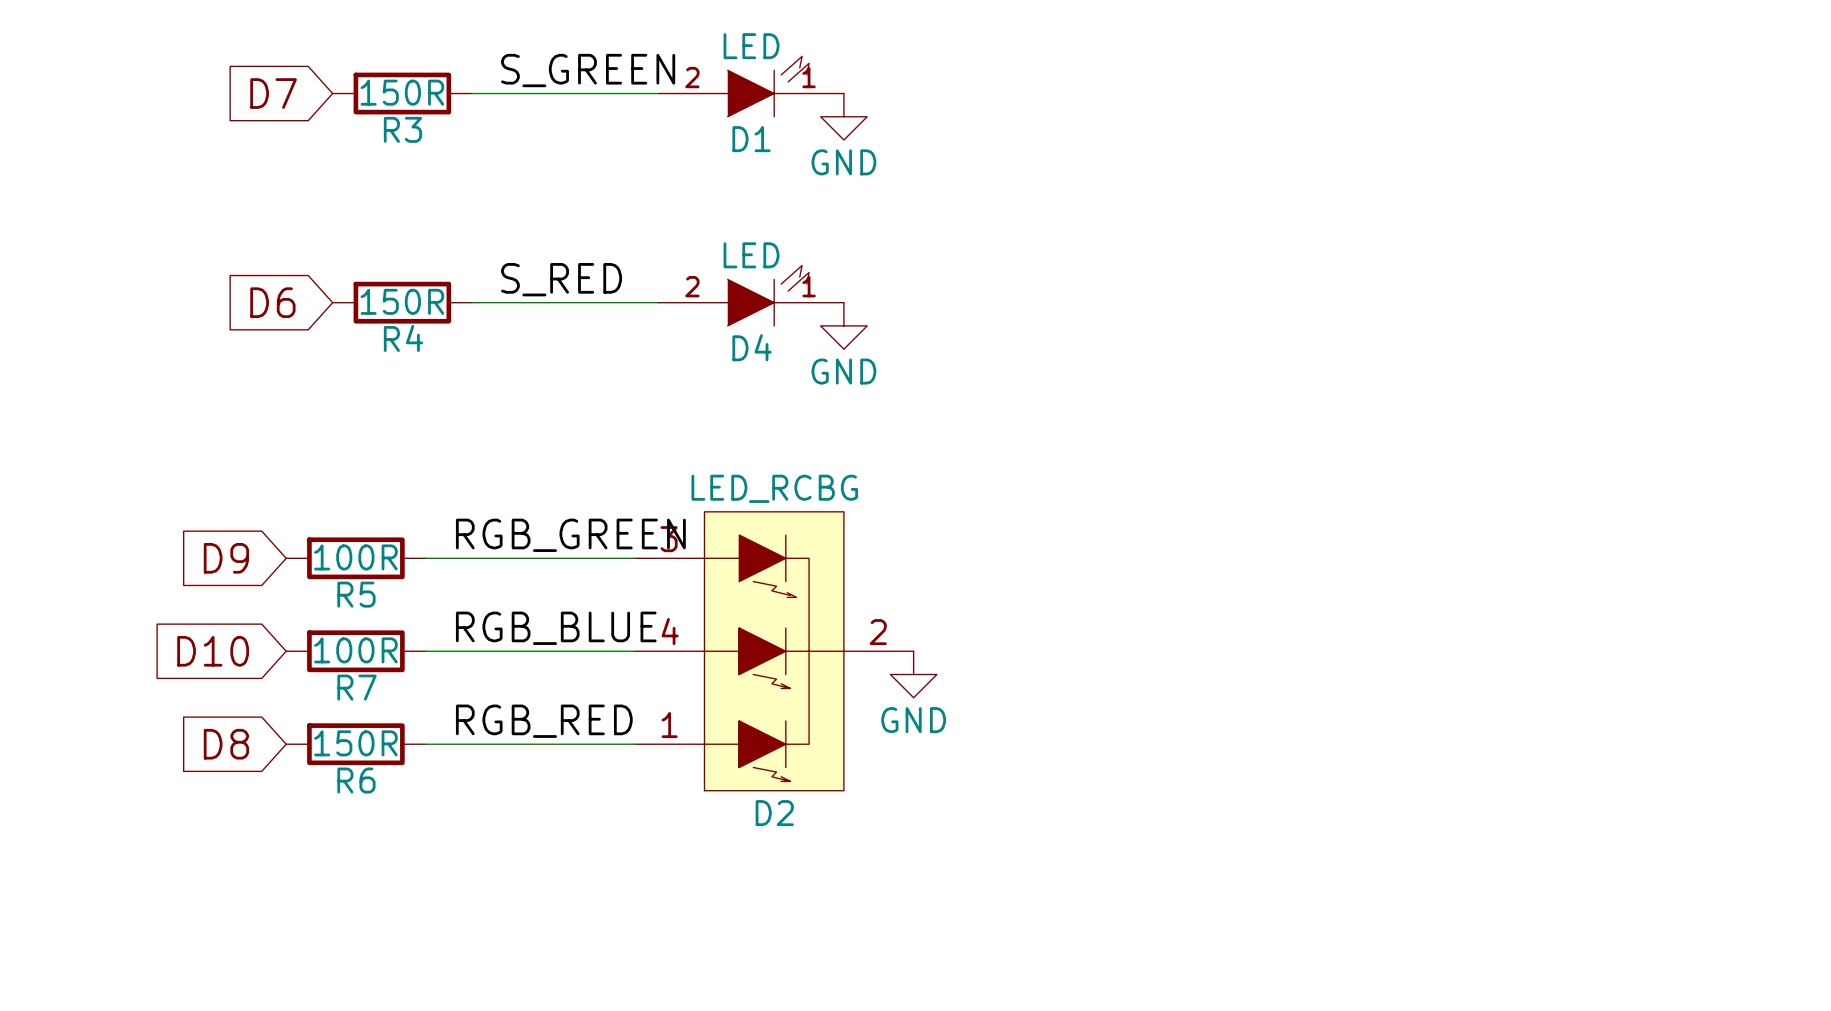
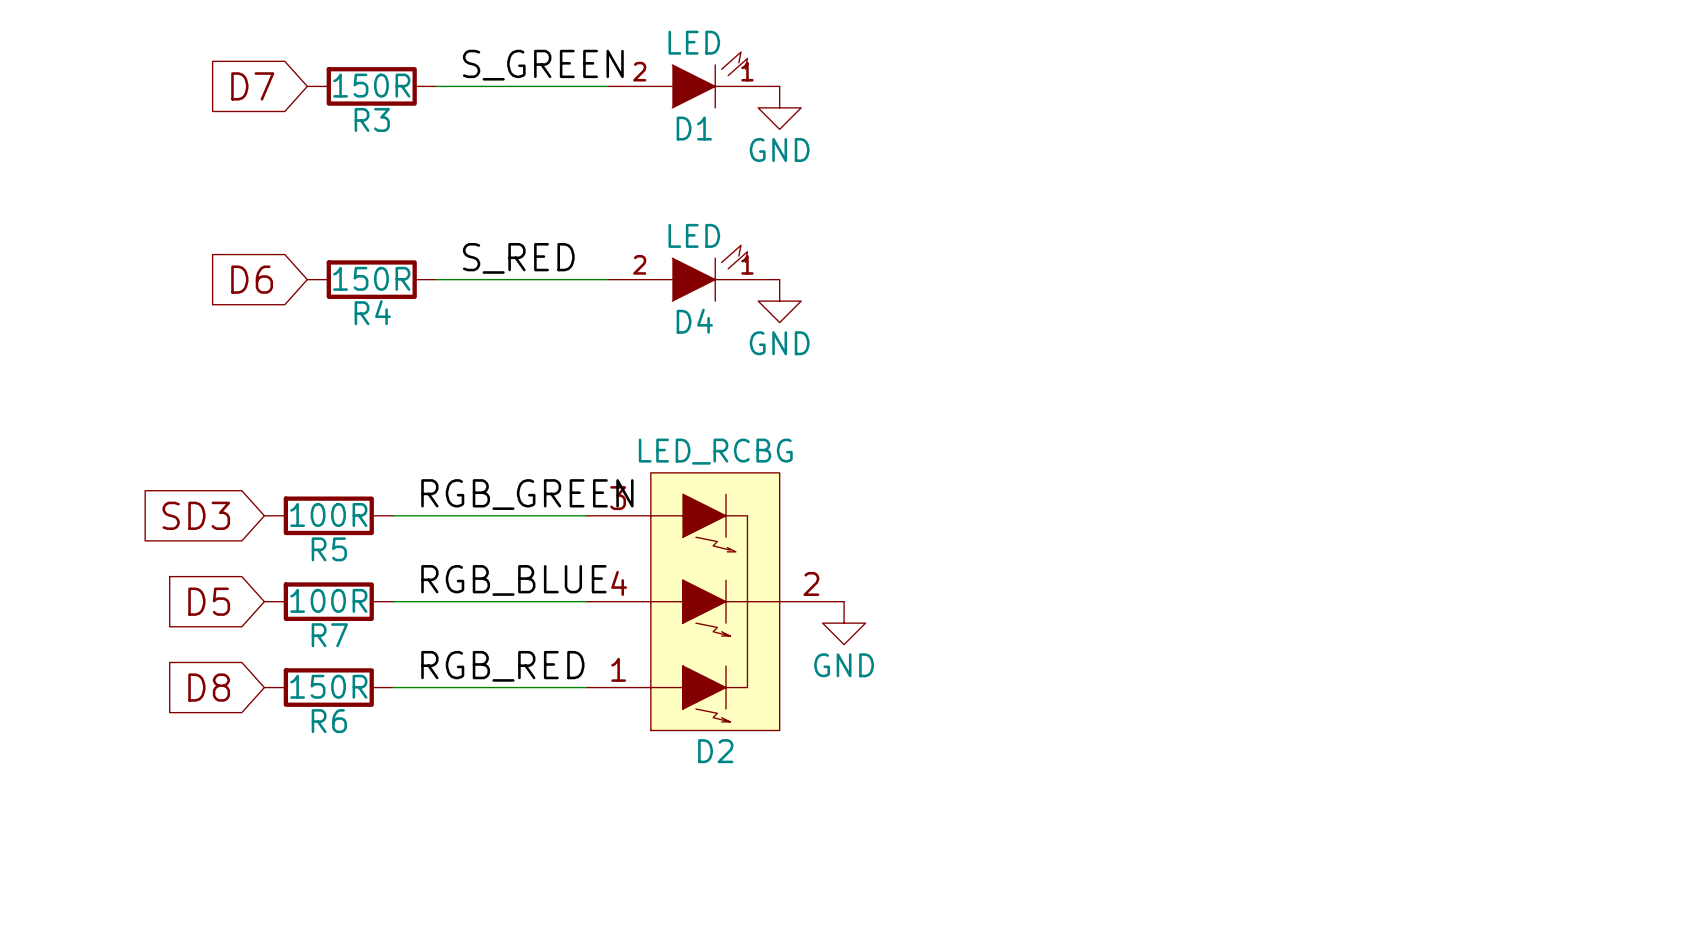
global label: D9 (226, 558) -> SD3 (196, 515)
global label: D10 (213, 651) -> D5 (209, 601)

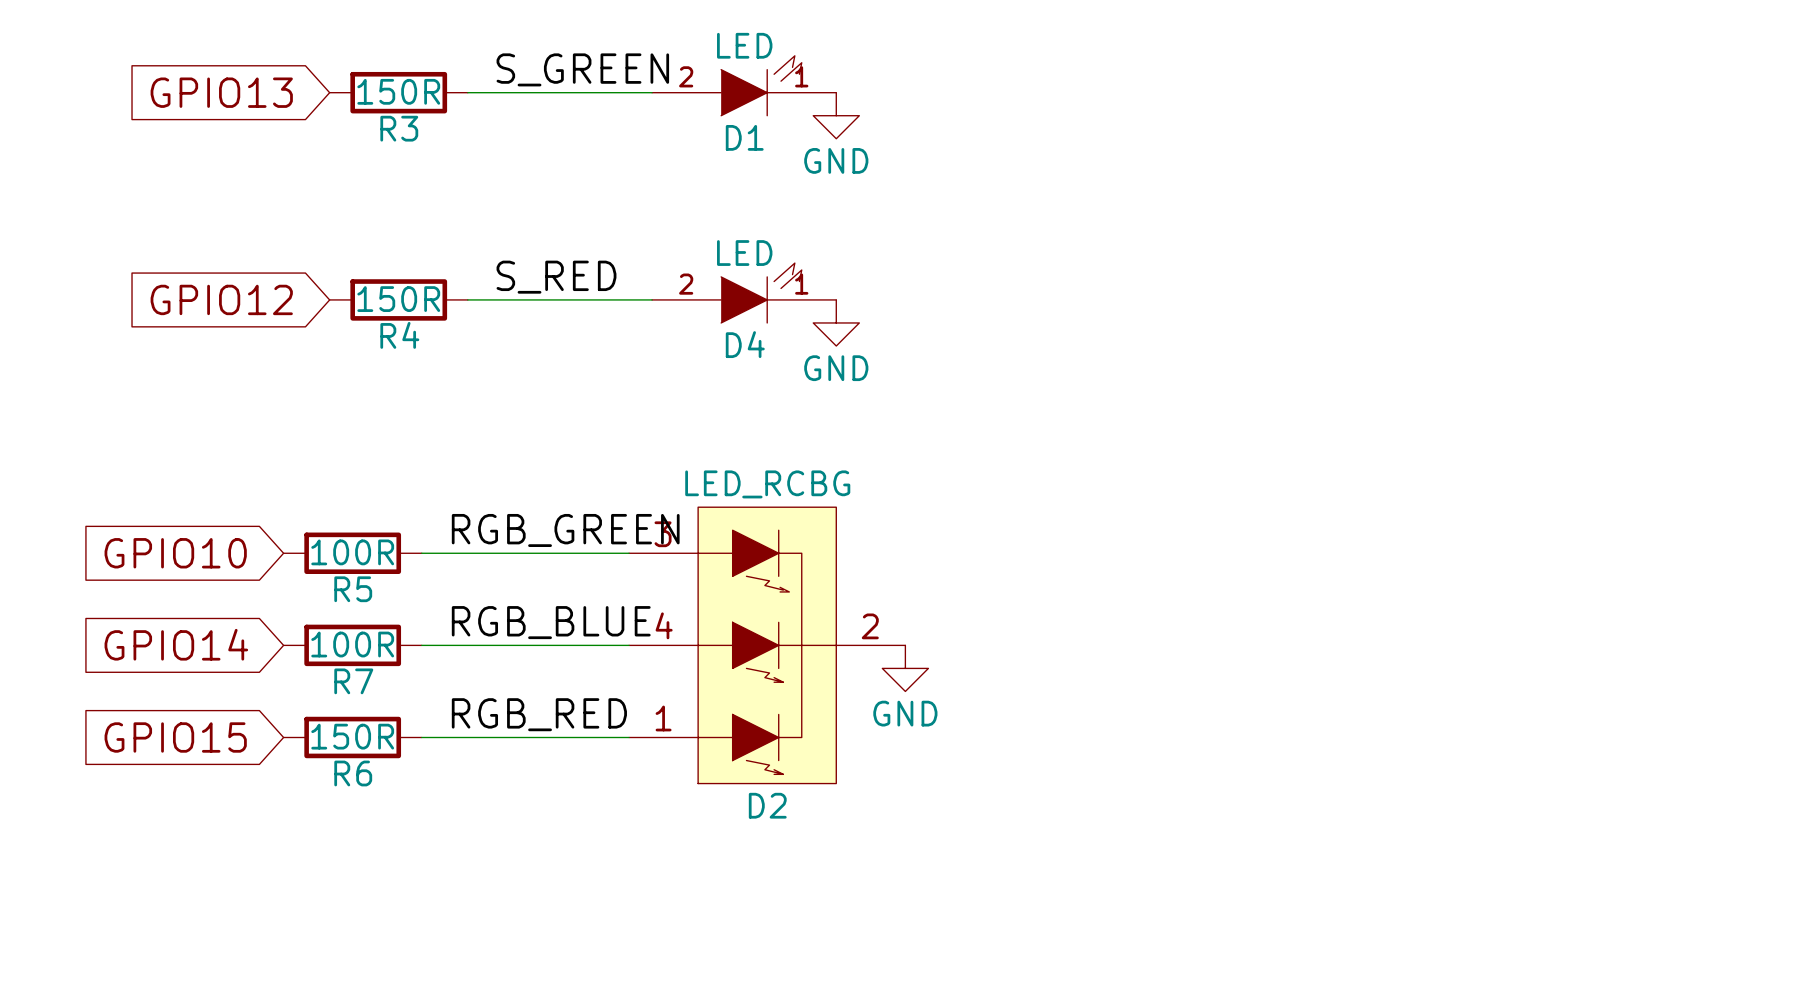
global label: D7 (252, 86) -> GPIO13 (221, 92)
global label: D6 (252, 279) -> GPIO12 (221, 299)
global label: SD3 (196, 515) -> GPIO10 (175, 553)
global label: D5 (209, 601) -> GPIO14 (176, 644)
global label: D8 (209, 687) -> GPIO15 (175, 737)

